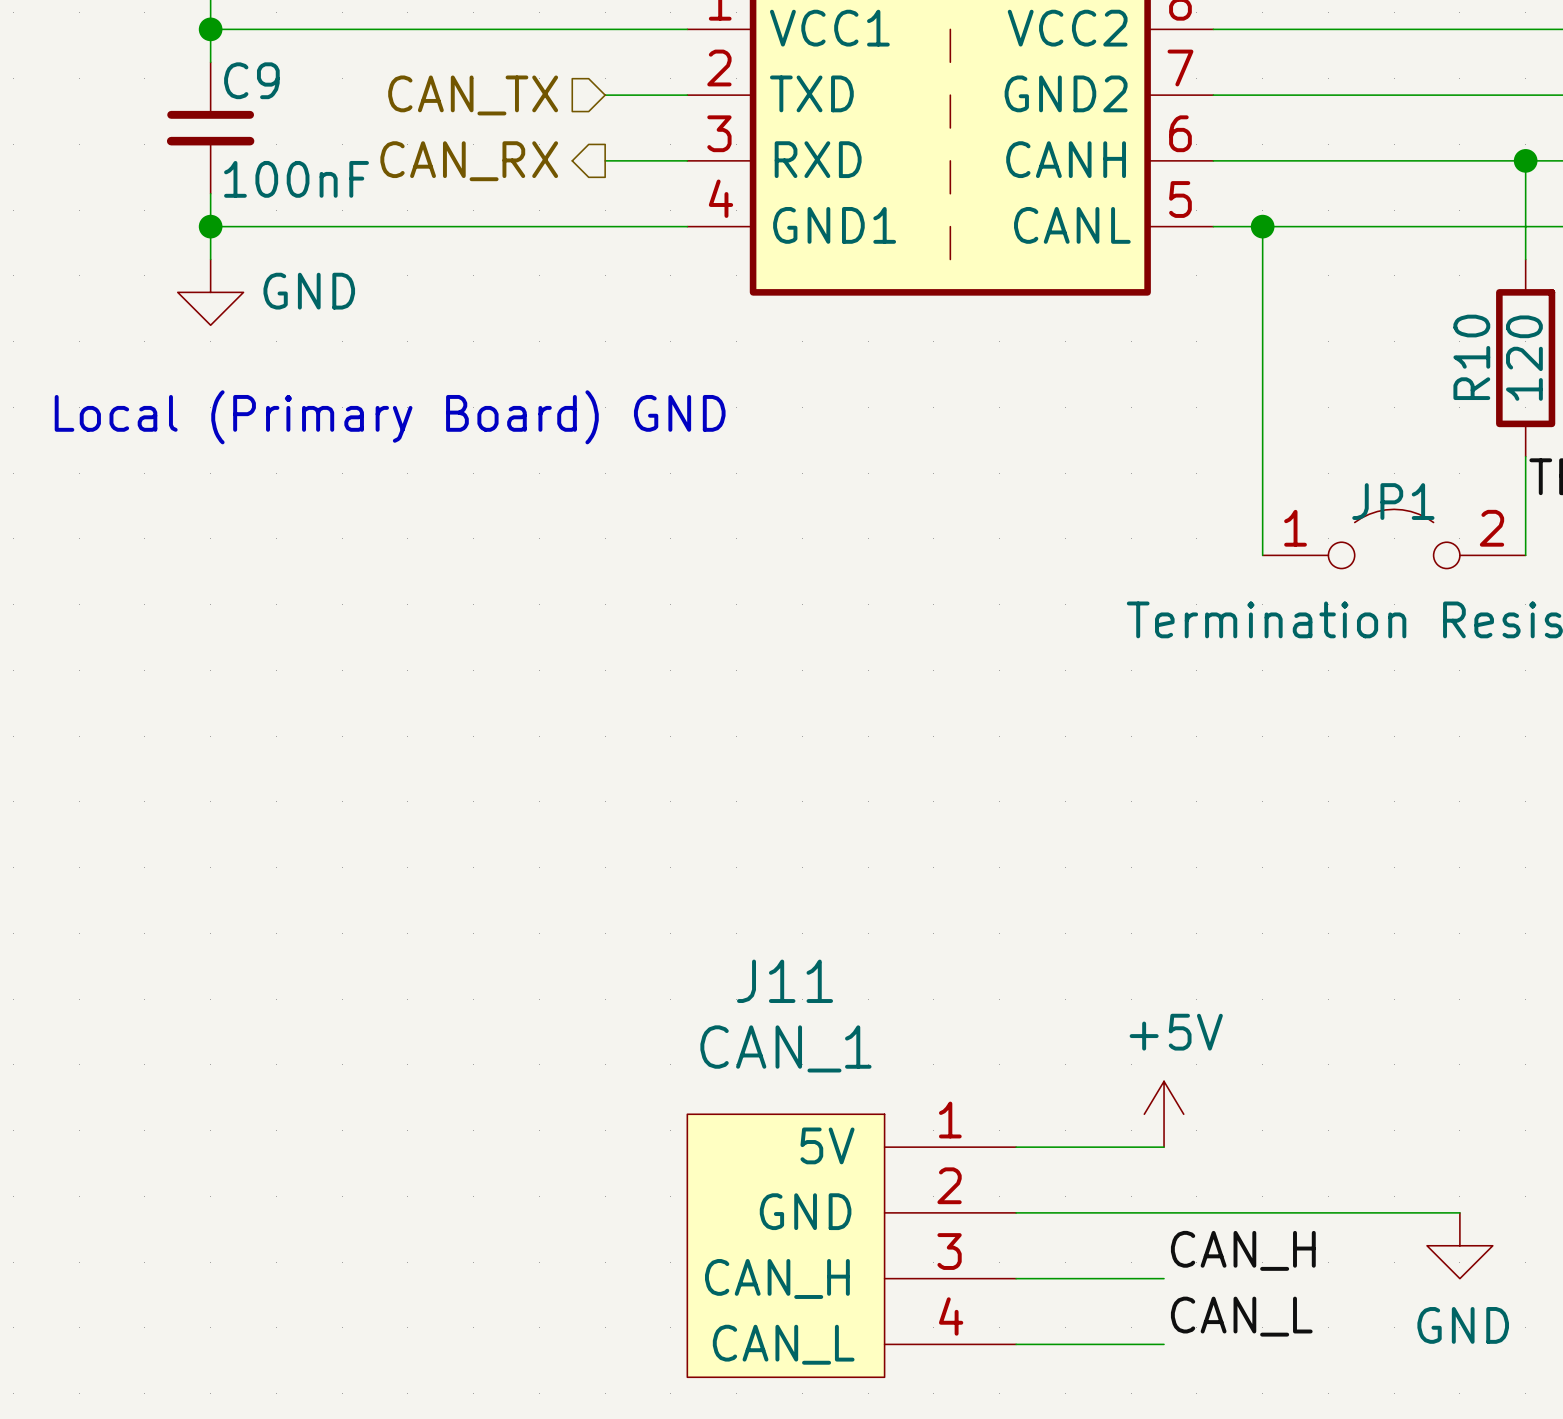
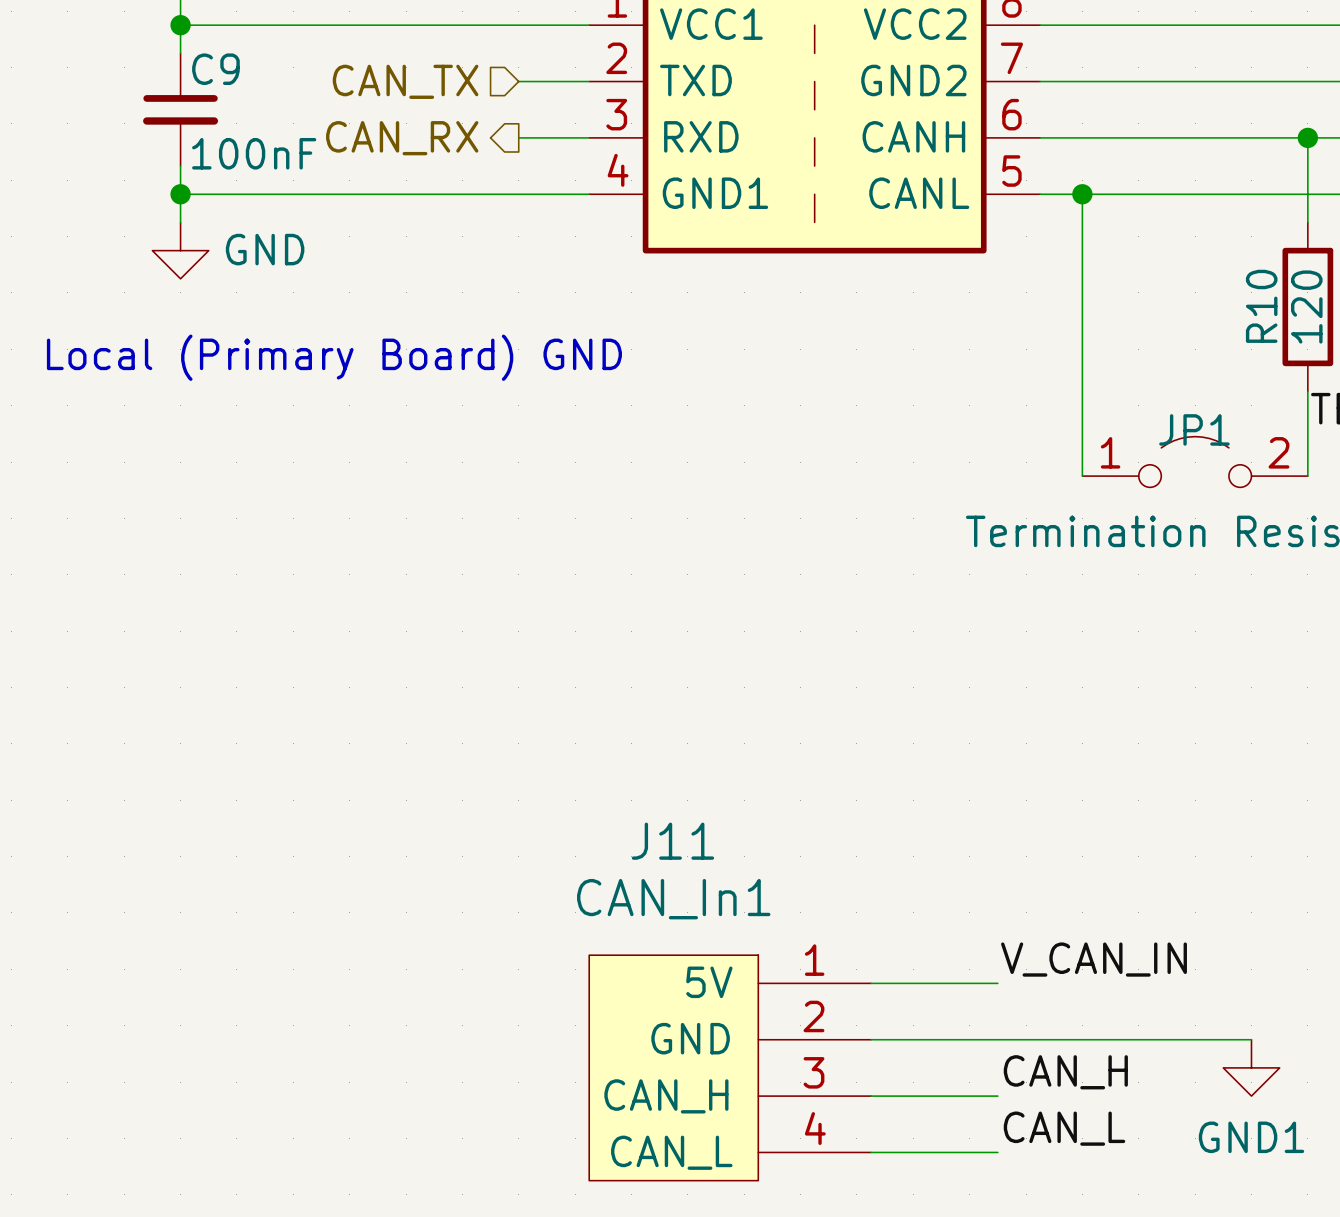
J11 value: CAN_1 (785, 1048) -> CAN_In1 (673, 899)
power symbol: +5V (1164, 1114) -> none
label: none -> V_CAN_IN (1094, 959)
power symbol: GND (1459, 1245) -> GND1 (1251, 1067)

